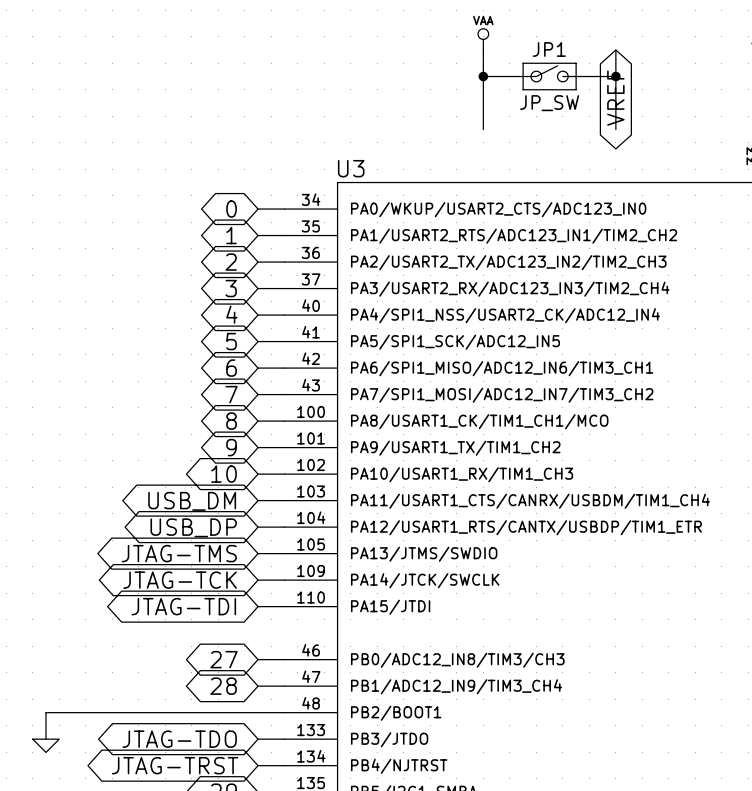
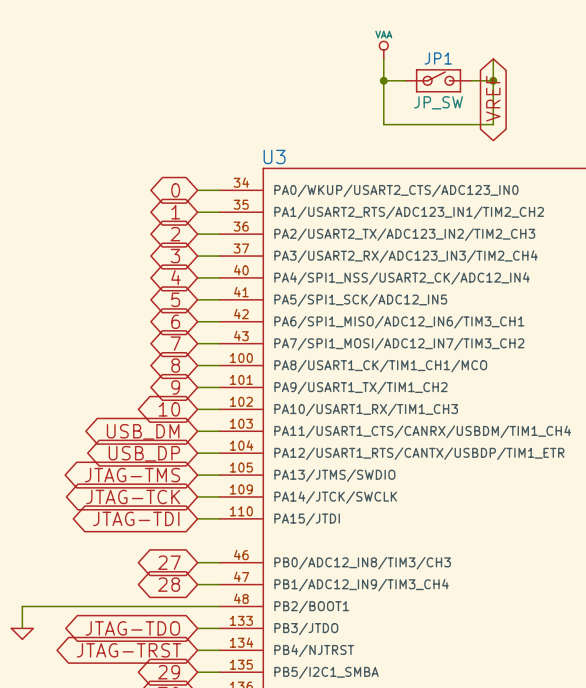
wire: none -> (383, 124) (493, 124)

